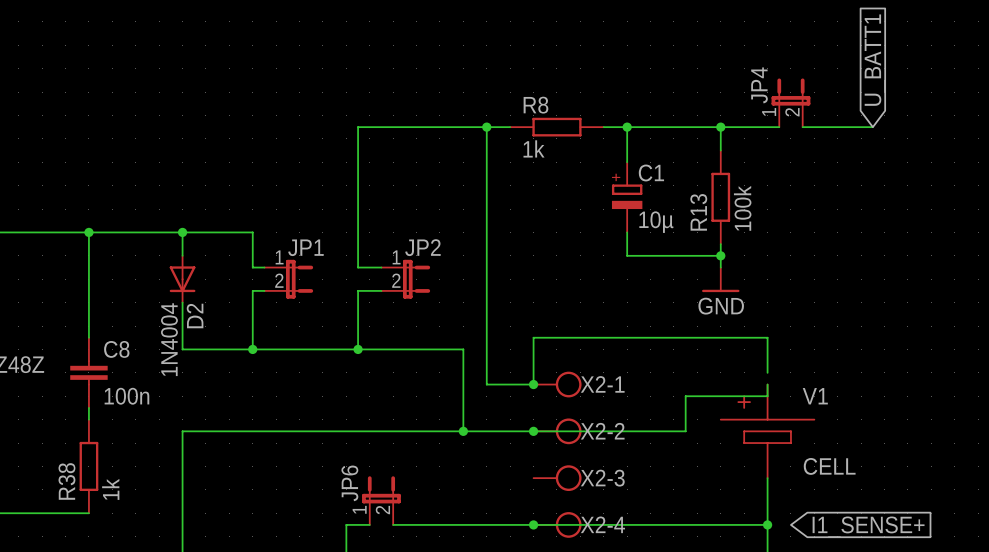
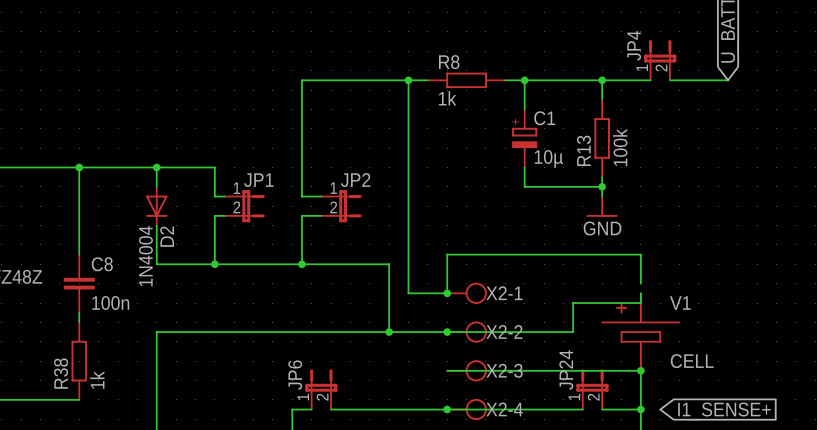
wire: none -> (447, 370) (640, 370)
junction: none -> (640, 370)
JP24: none -> (592, 389)
wire: (697, 524) (720, 524) -> none

